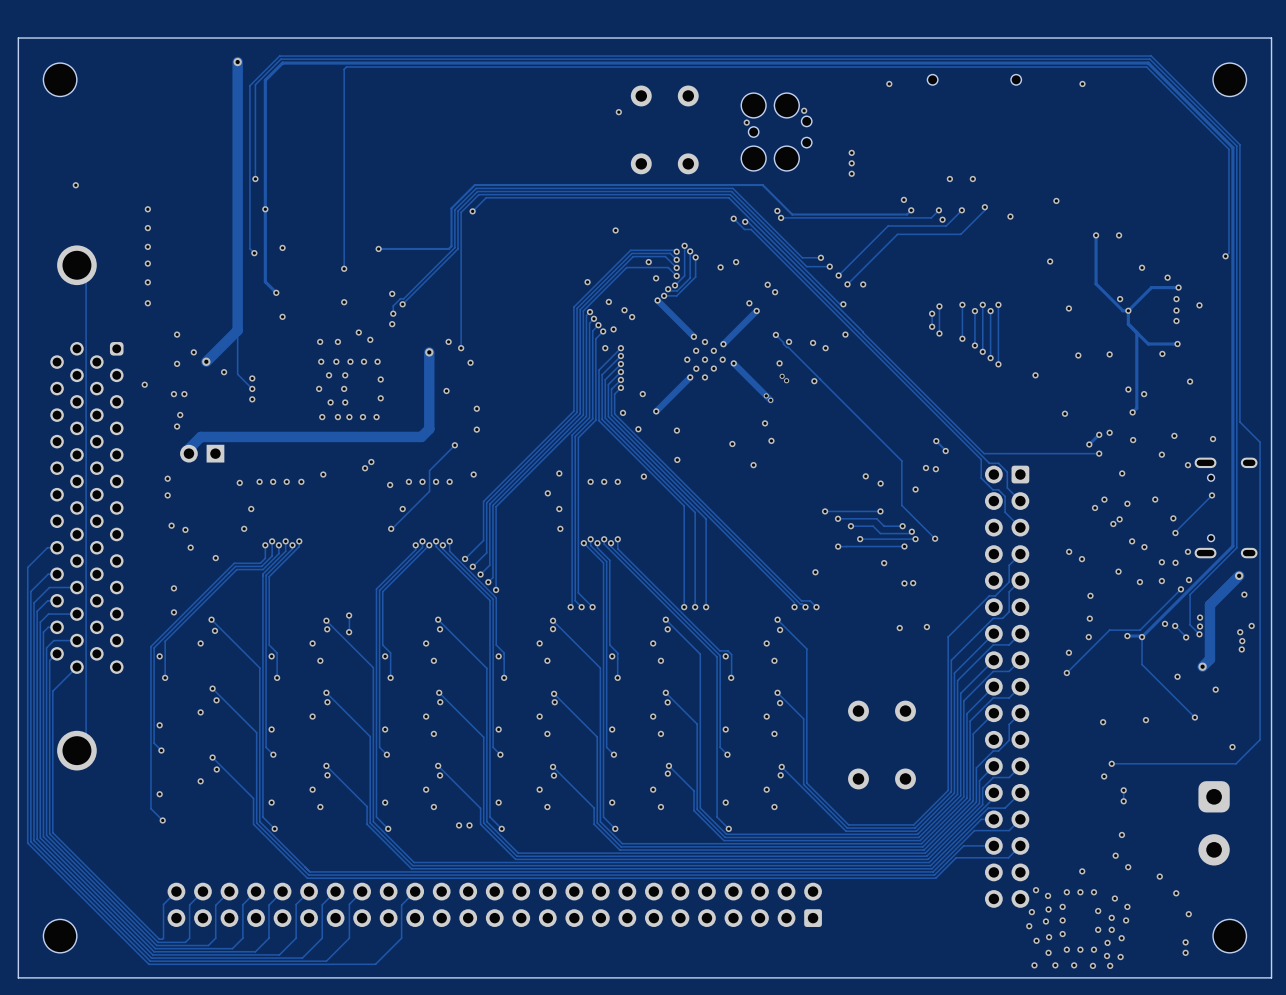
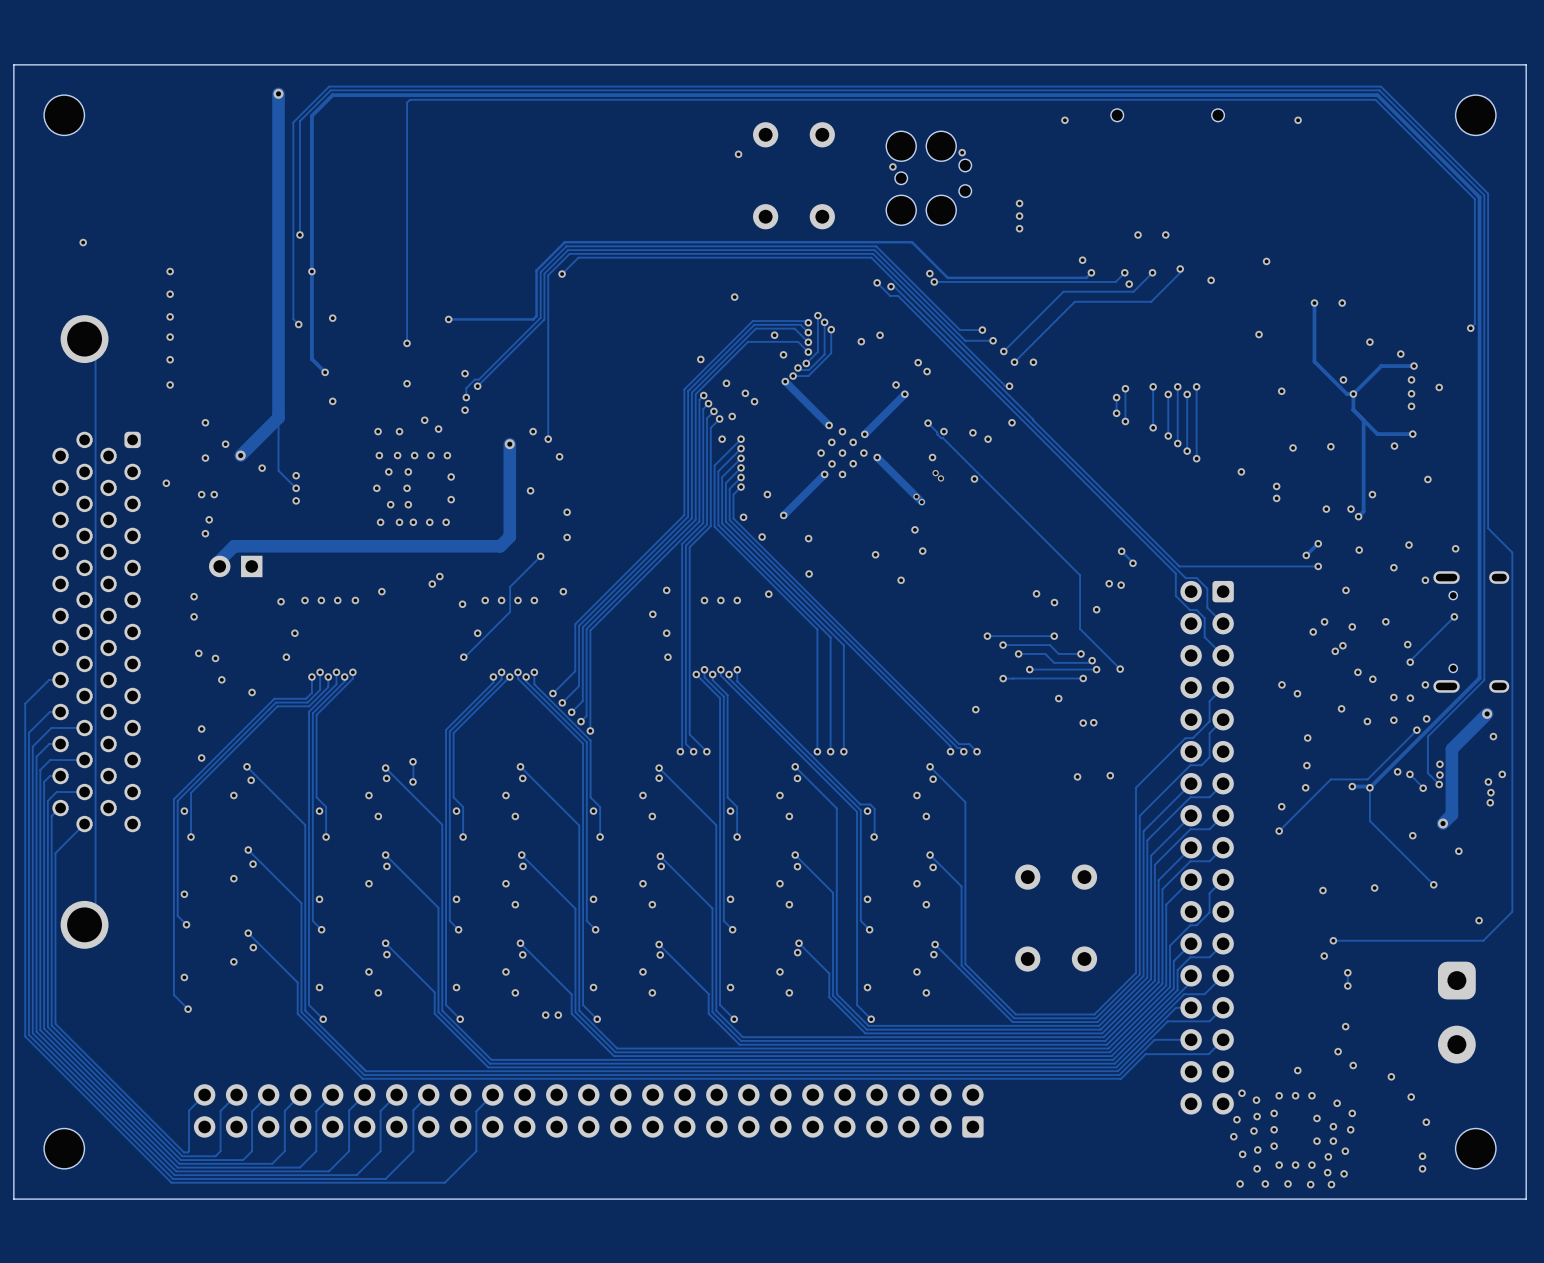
via: none -> (1276, 486)
via: (1128, 389) -> none
via: none -> (1276, 498)
via: none -> (1326, 509)
via: none -> (1351, 509)
via: (1064, 413) -> none
via: (1109, 432) -> none

